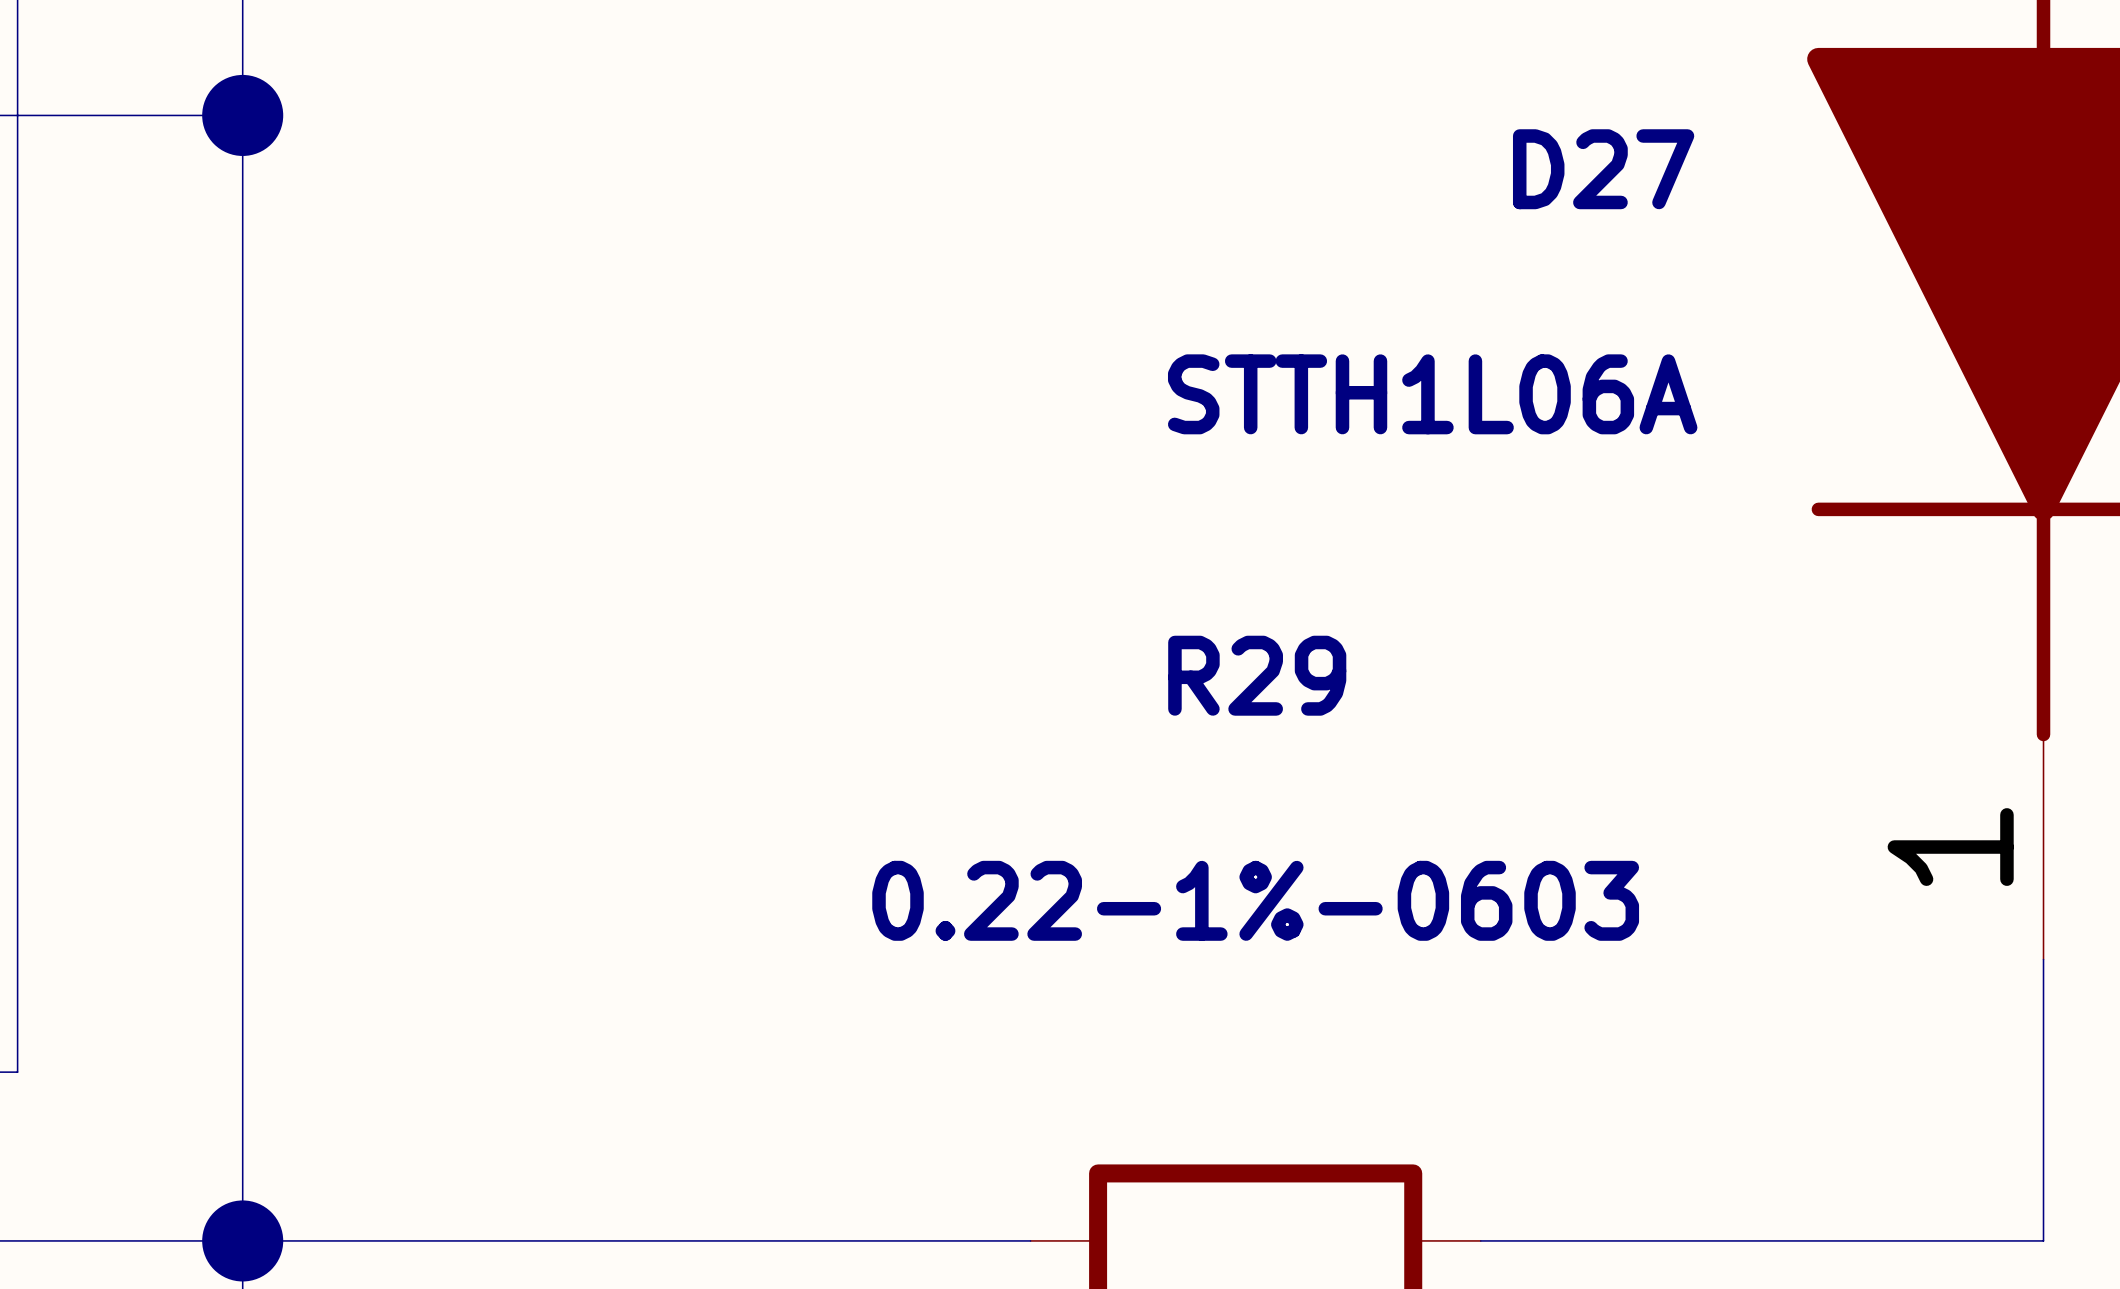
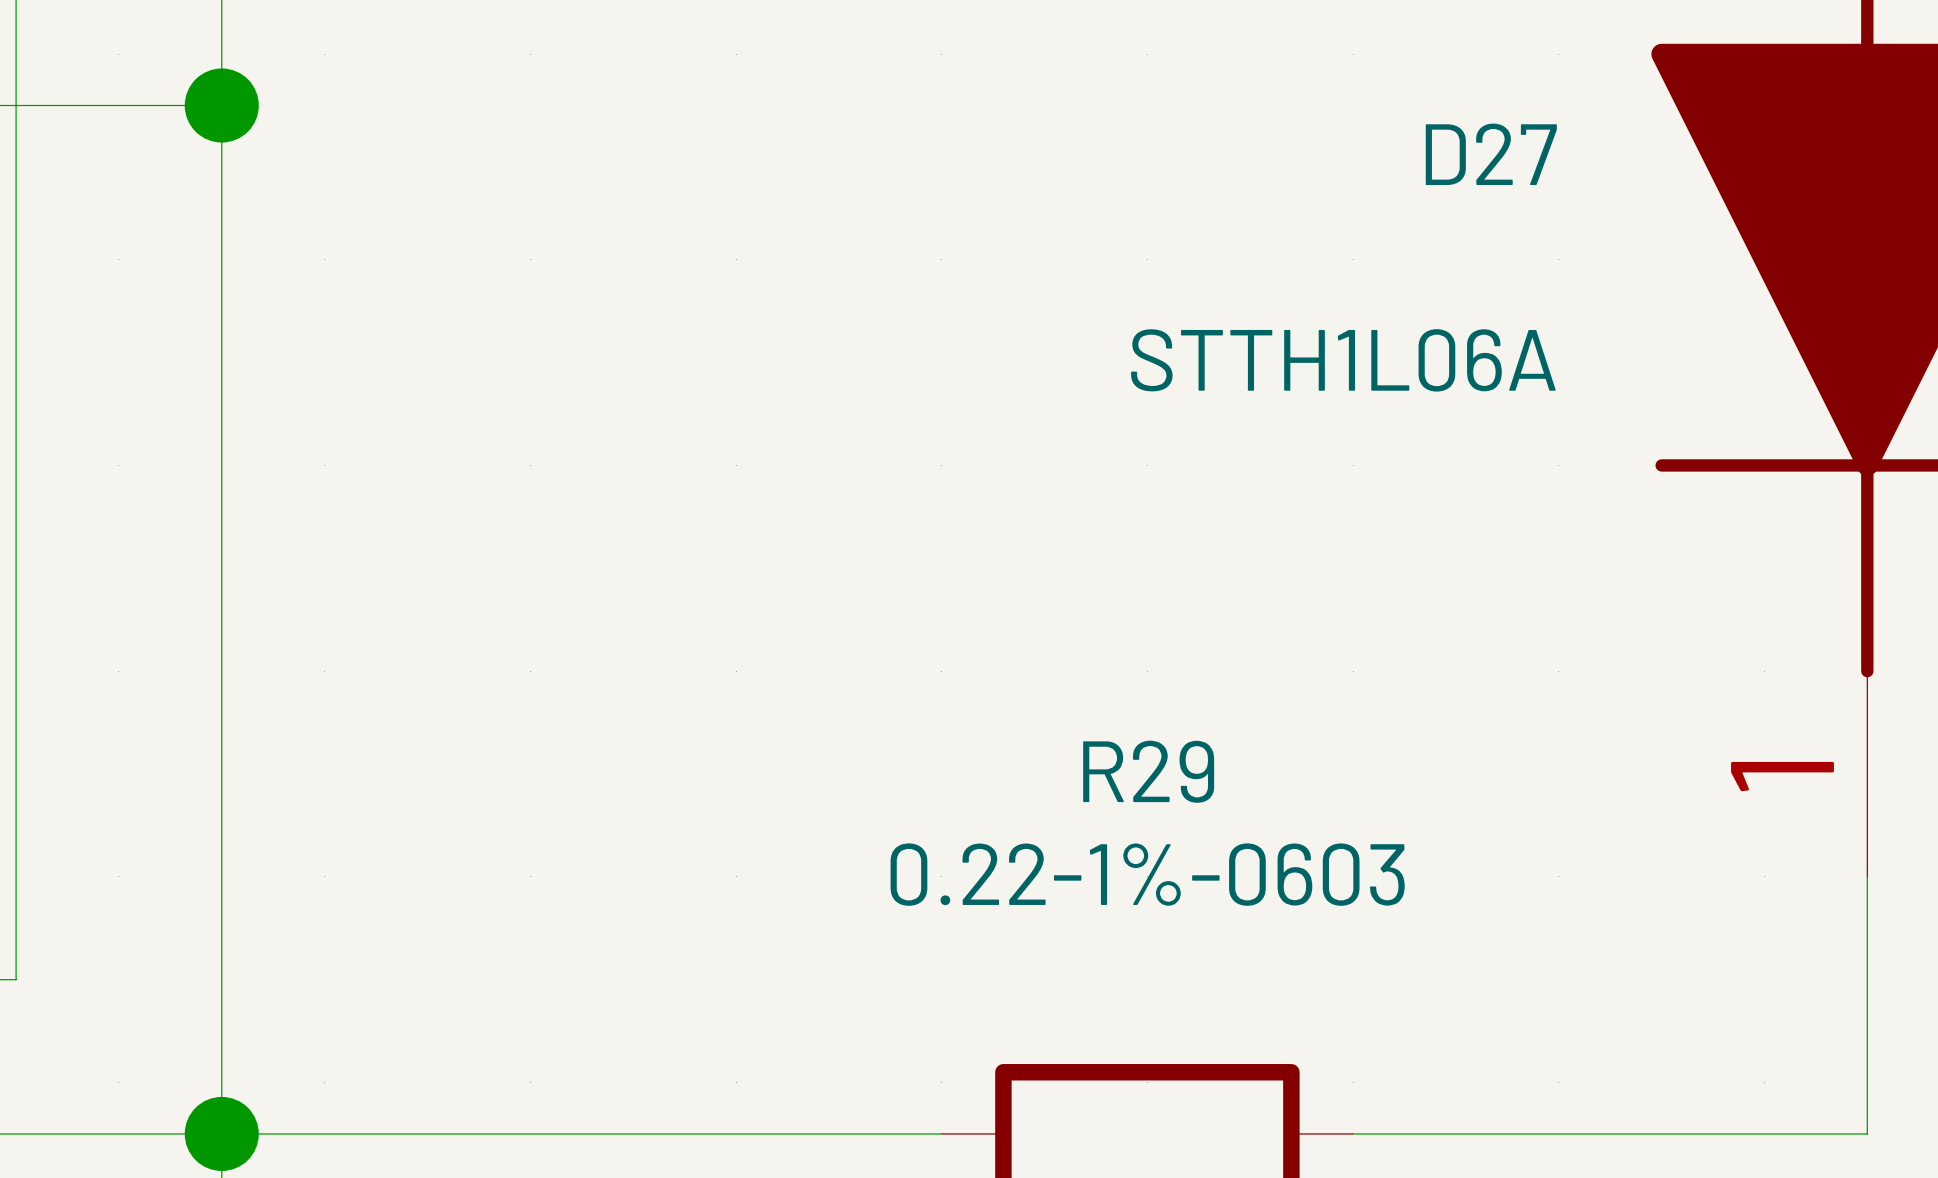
R29 name position: R29 (1257, 675) -> R29 (1148, 771)
R29 value position: 0.22-1%-0603 (1255, 900) -> 0.22-1%-0603 (1147, 874)

